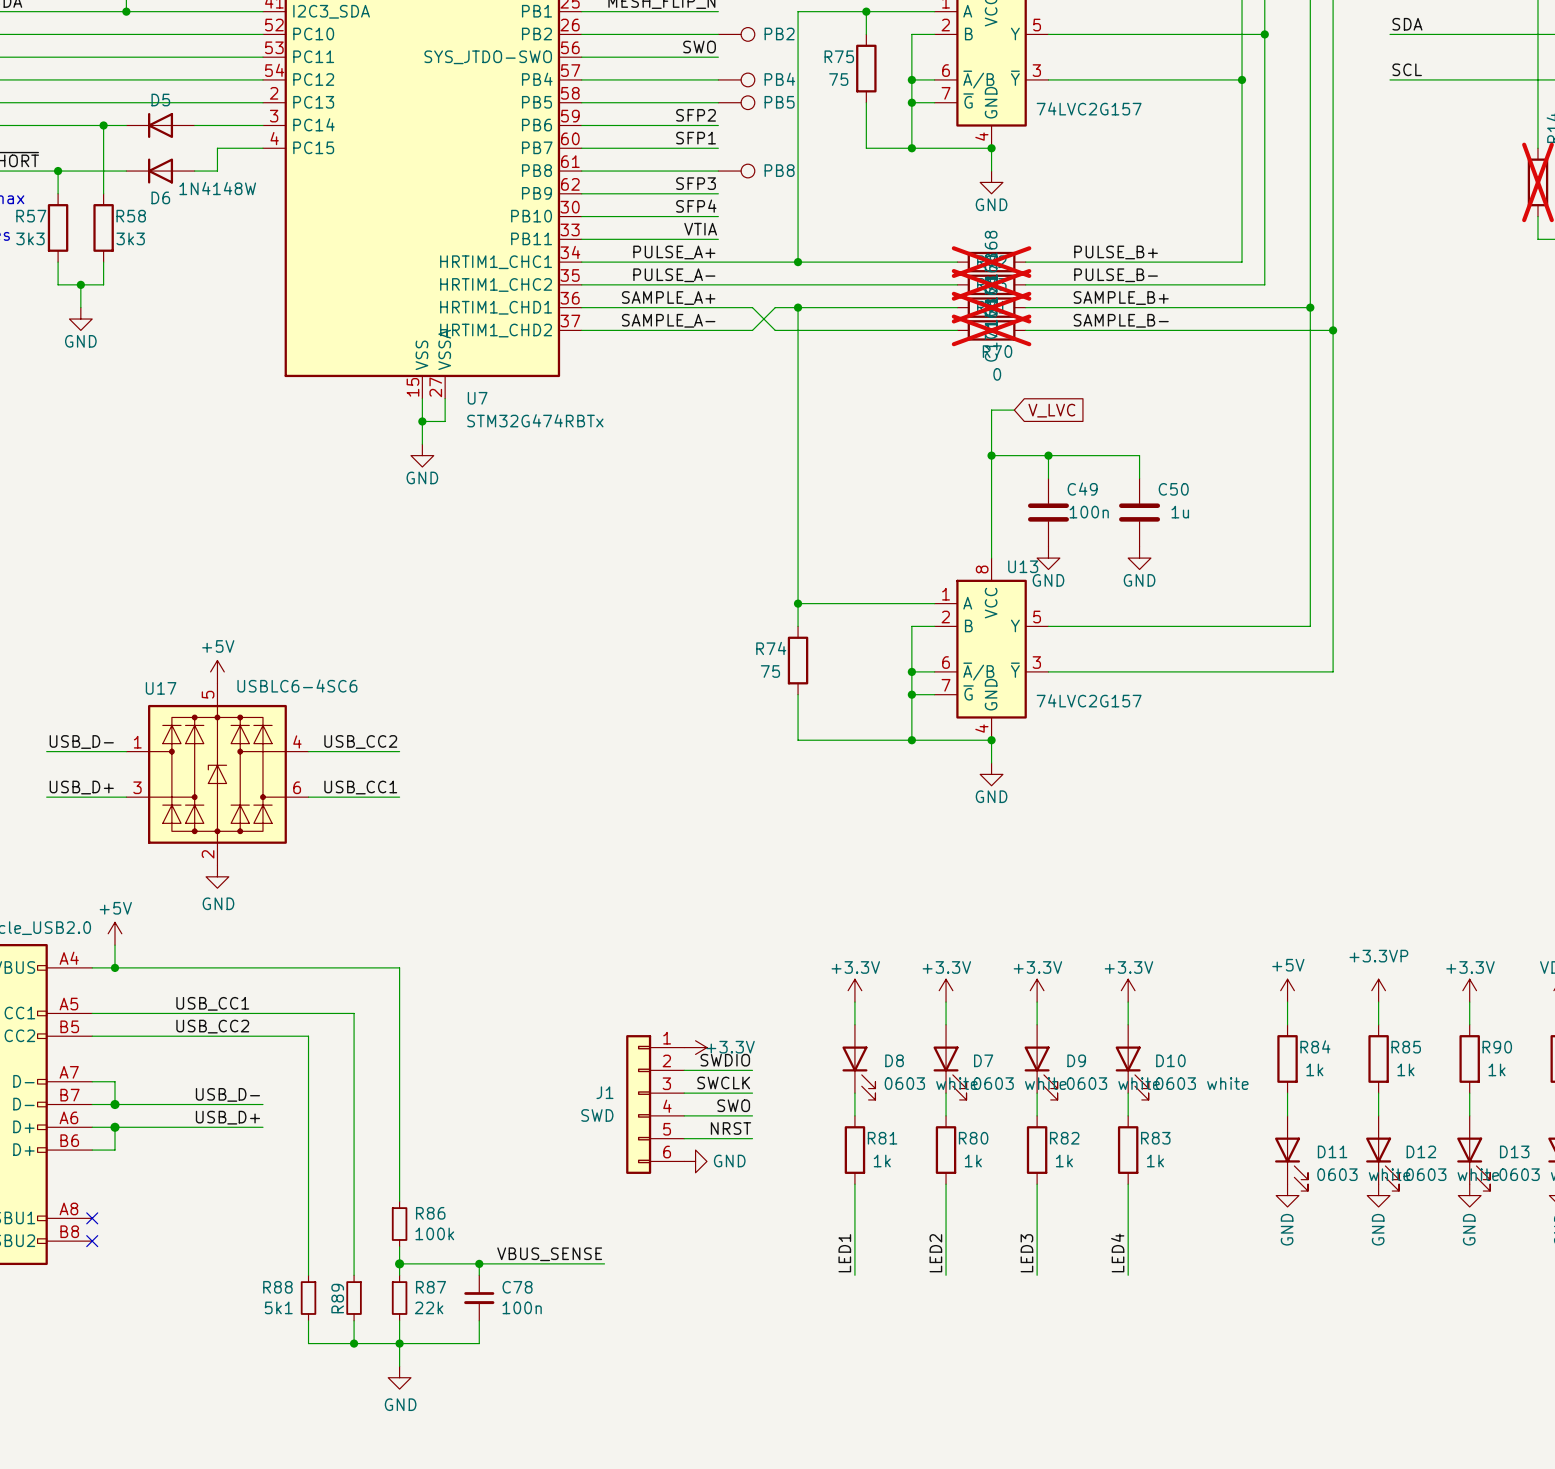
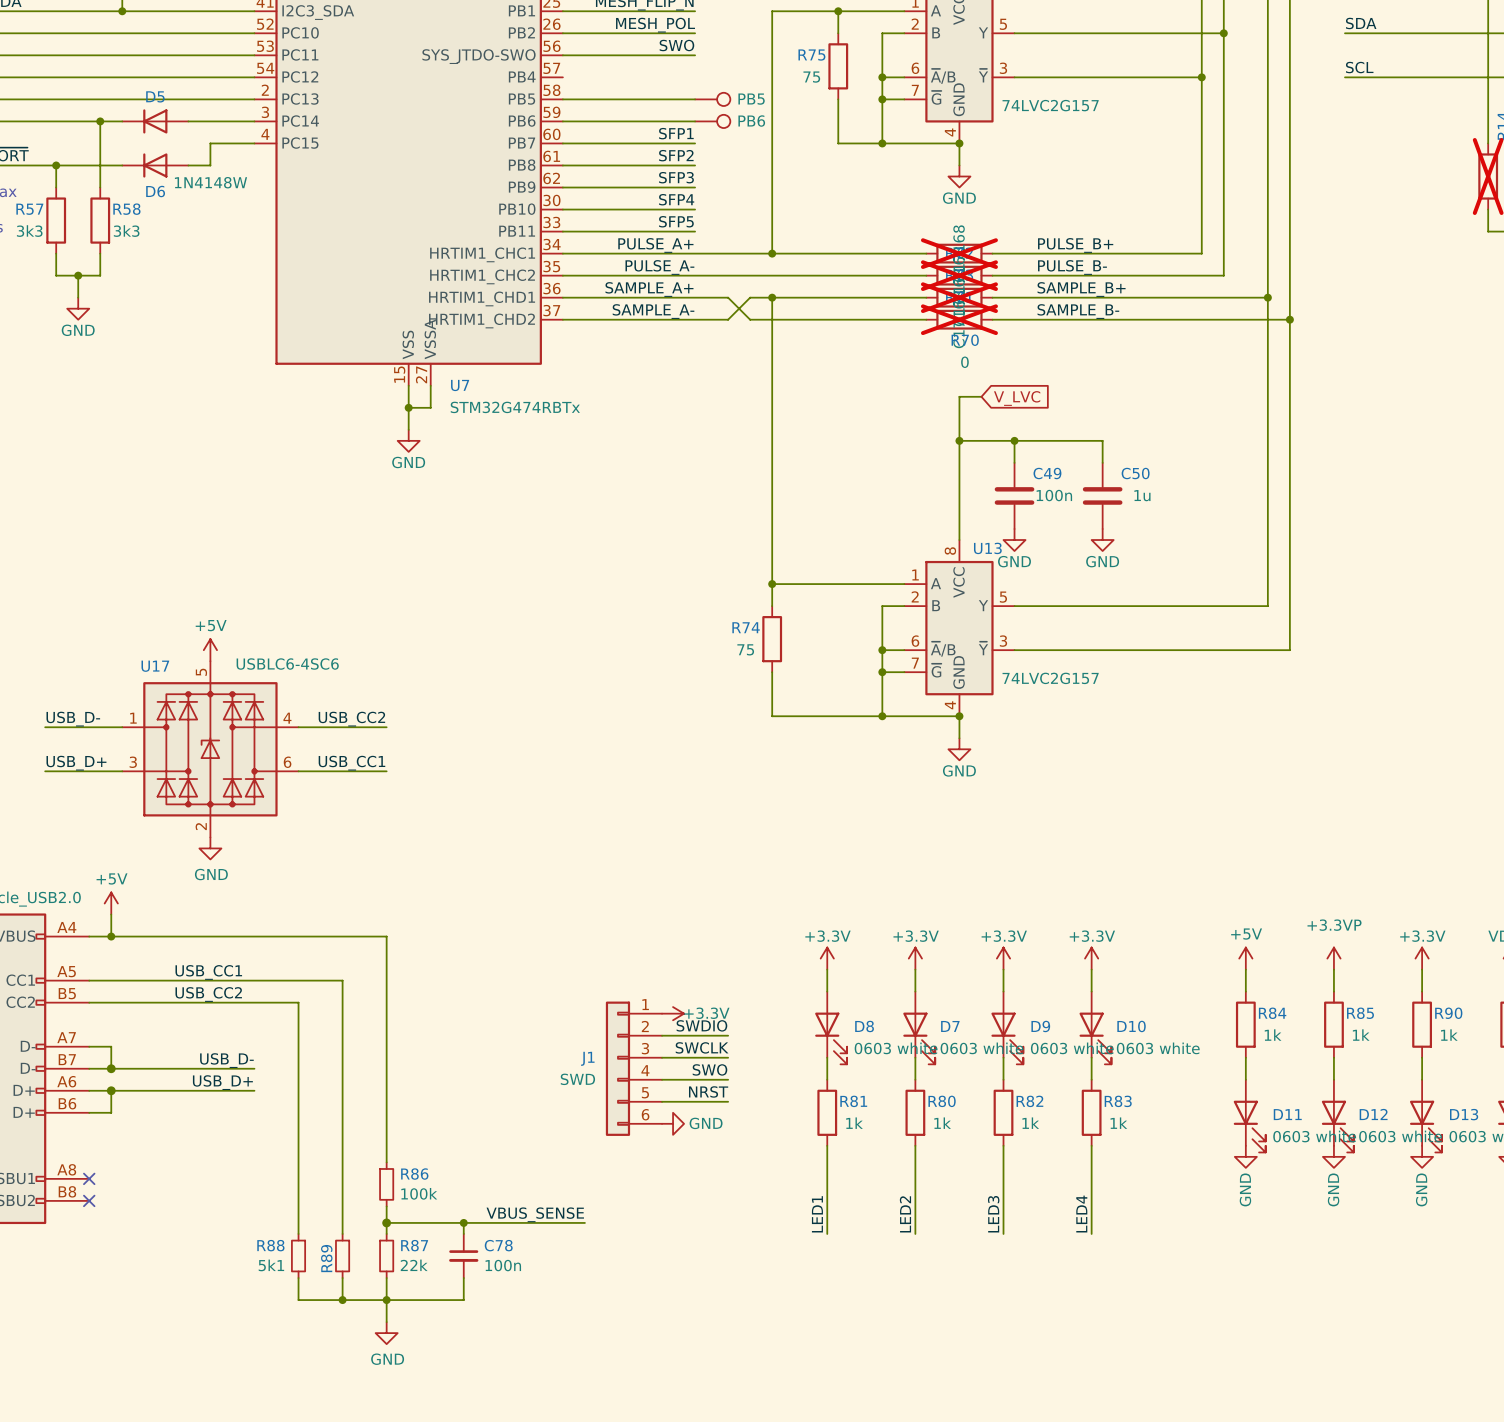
label: none -> MESH_POL (655, 25)
part: PB2 (736, 34) -> none
wire: (581, 79) (718, 79) -> none
part: PB4 (736, 79) -> none
label position: SFP2 (696, 115) -> SFP2 (676, 155)
part: none -> PB6 (712, 121)
part: PB8 (736, 171) -> none
label: VTIA (700, 229) -> SFP5 (676, 221)

